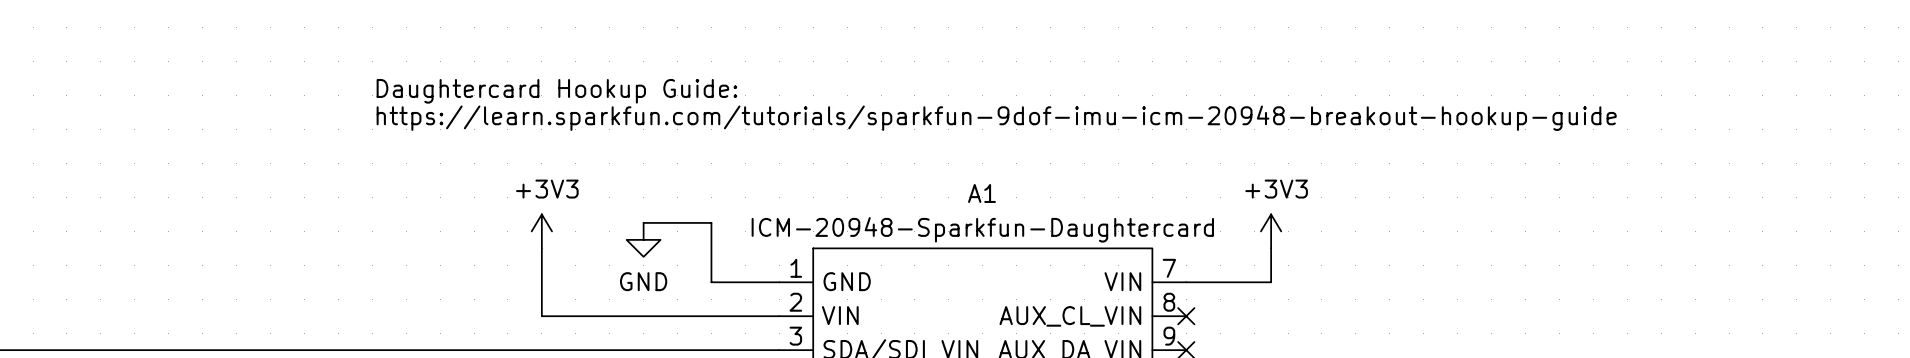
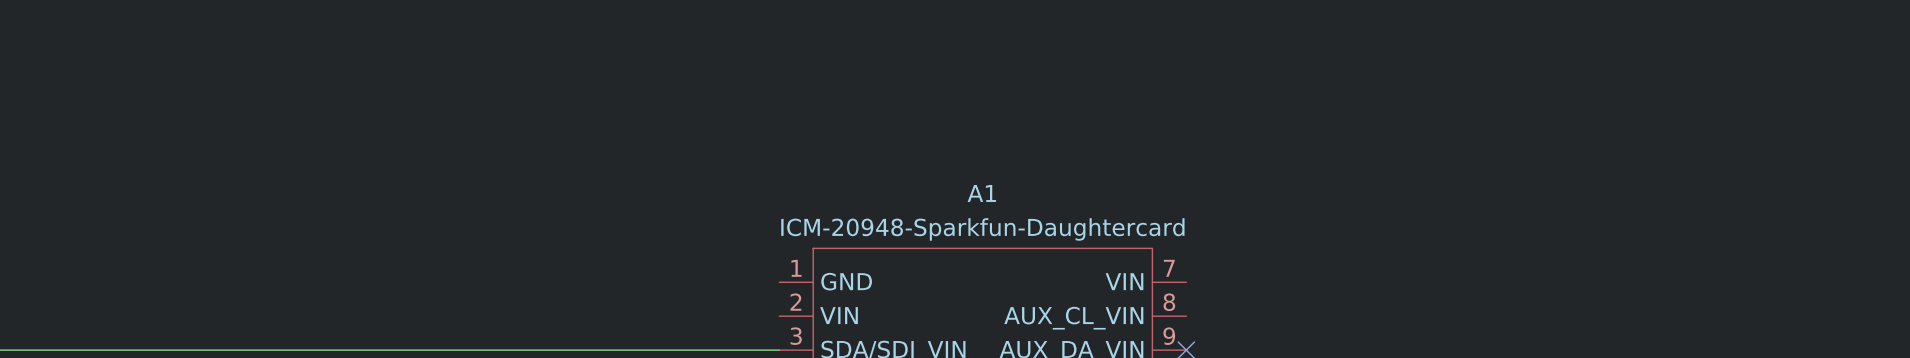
text: Daughtercard Hookup Guide: (556, 91) -> none
text: https://learn.sparkfun.com/tutorials/sparkfun-9dof-imu-icm-20948-breakout-hookup-guide (996, 118) -> none
wire: (643, 222) (711, 222) (711, 282) (779, 282) -> none
power symbol: +3V3 (541, 231) -> none
power symbol: +3V3 (1271, 231) -> none
power symbol: GND (643, 239) -> none
wire: (541, 248) (541, 316) (779, 316) -> none
wire: (1271, 248) (1271, 282) (1186, 282) -> none
no-connect mark: (1186, 316) -> none

